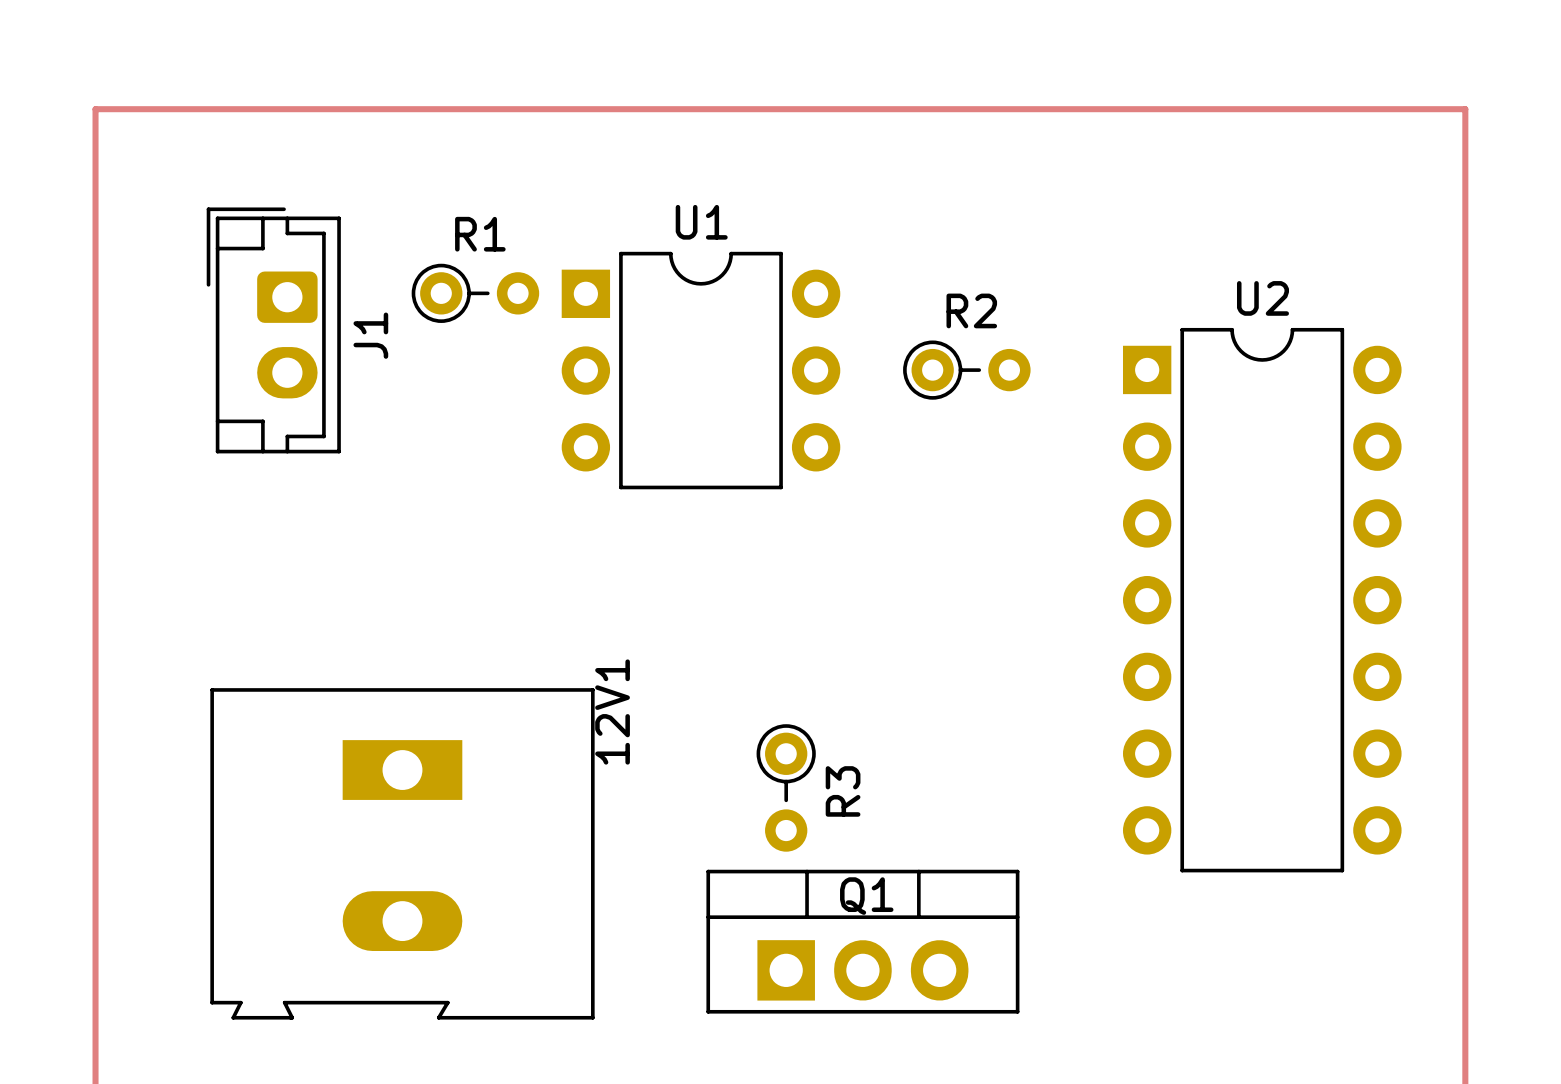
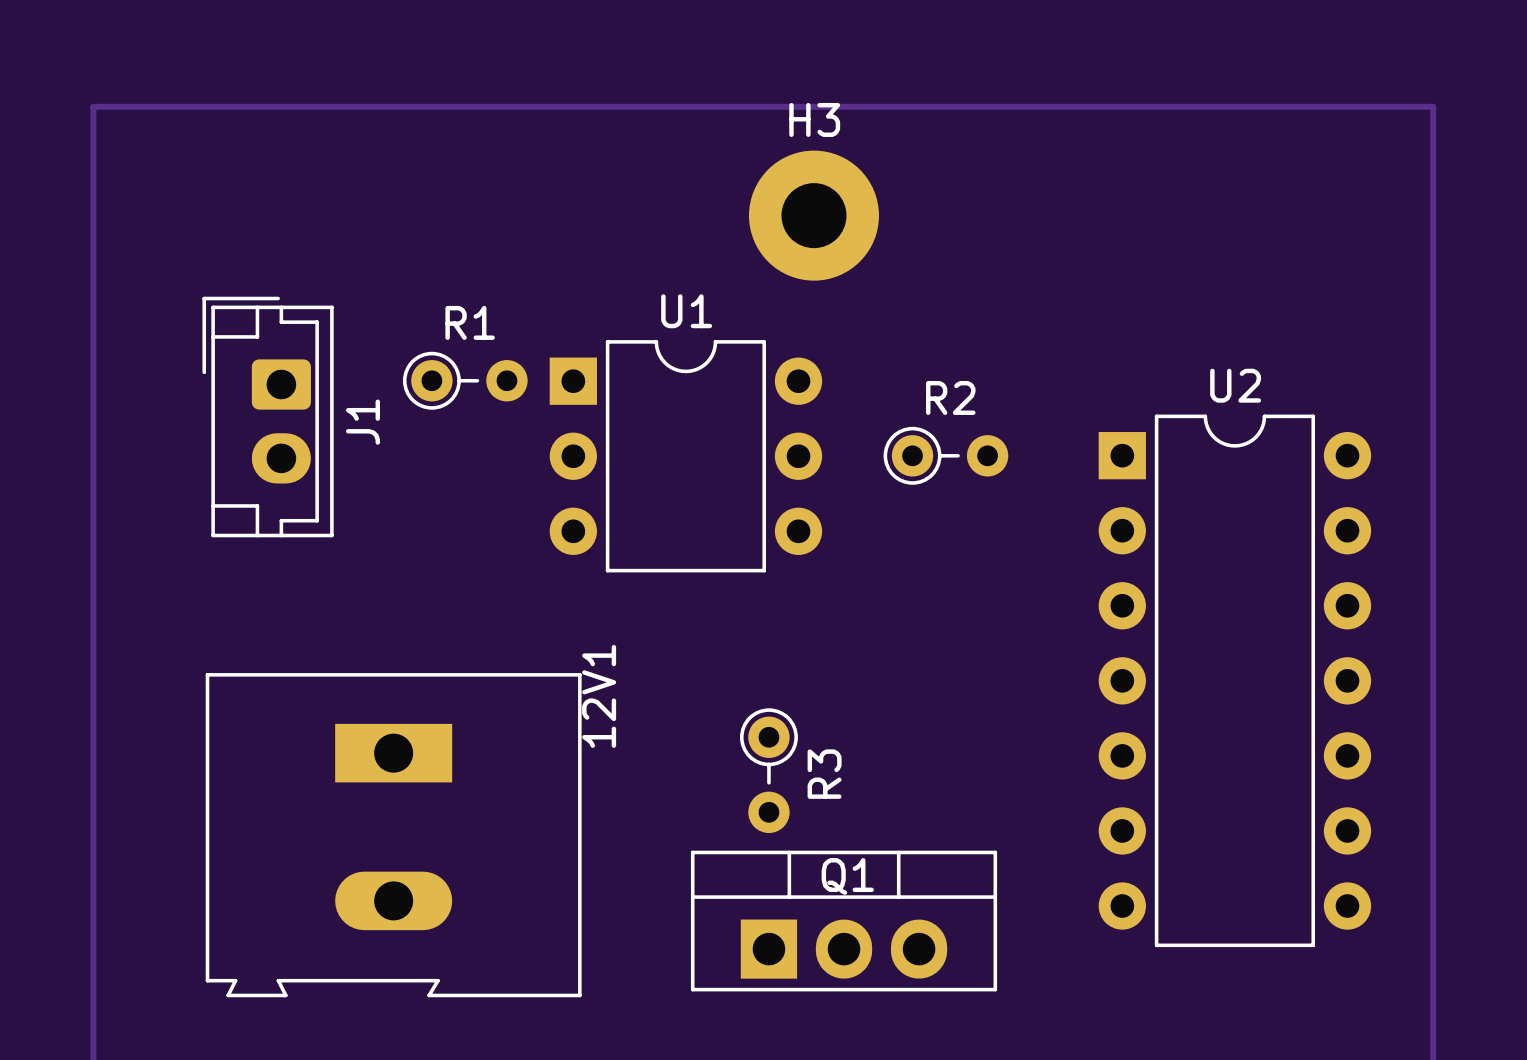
H3: none -> (813, 215)
R1 position: (475, 293) -> (465, 380)
J1 position: (273, 330) -> (268, 417)
U1 position: (700, 370) -> (685, 456)
R2 position: (966, 370) -> (945, 455)
U2 position: (1262, 600) -> (1234, 680)

